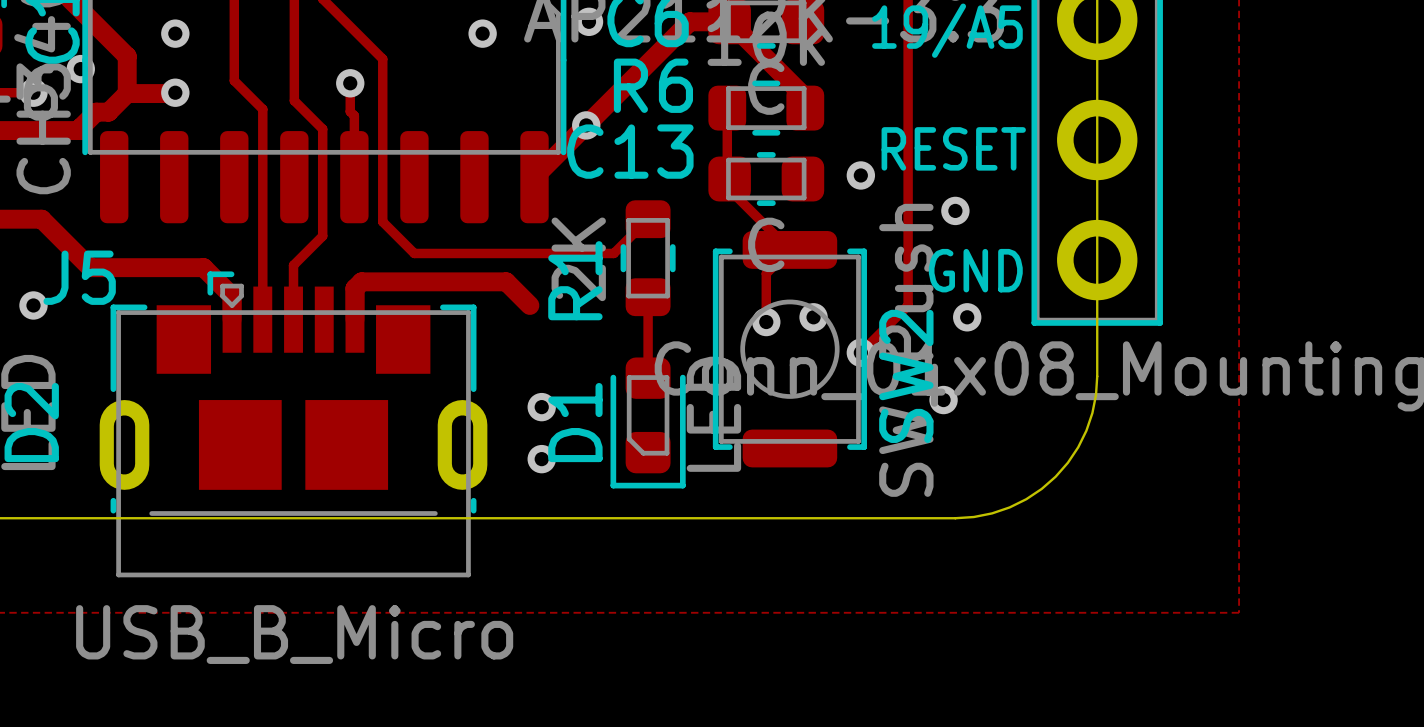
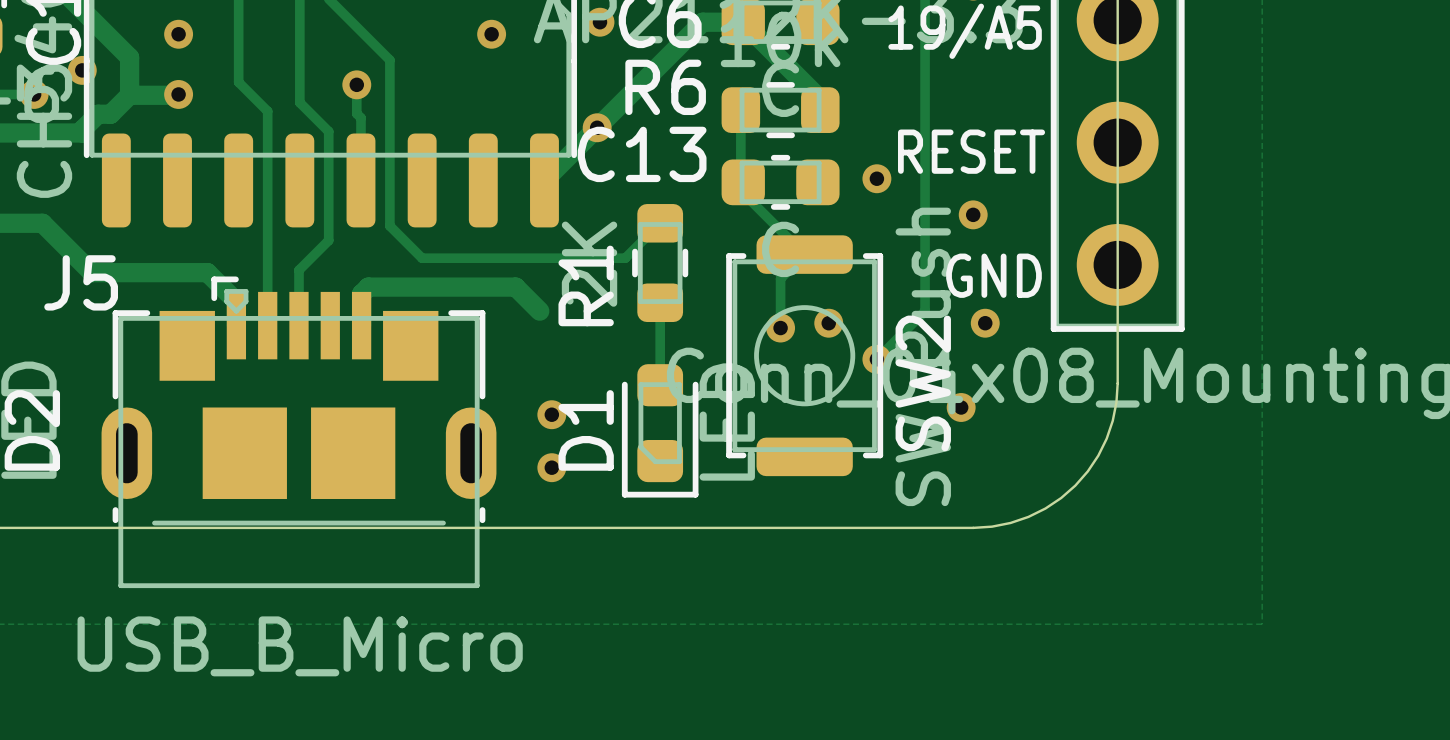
via: (33, 305) -> none

